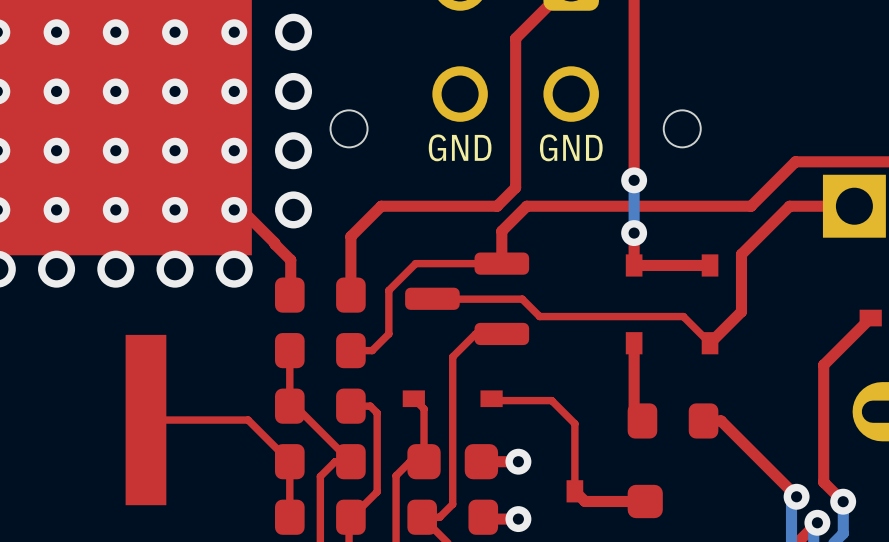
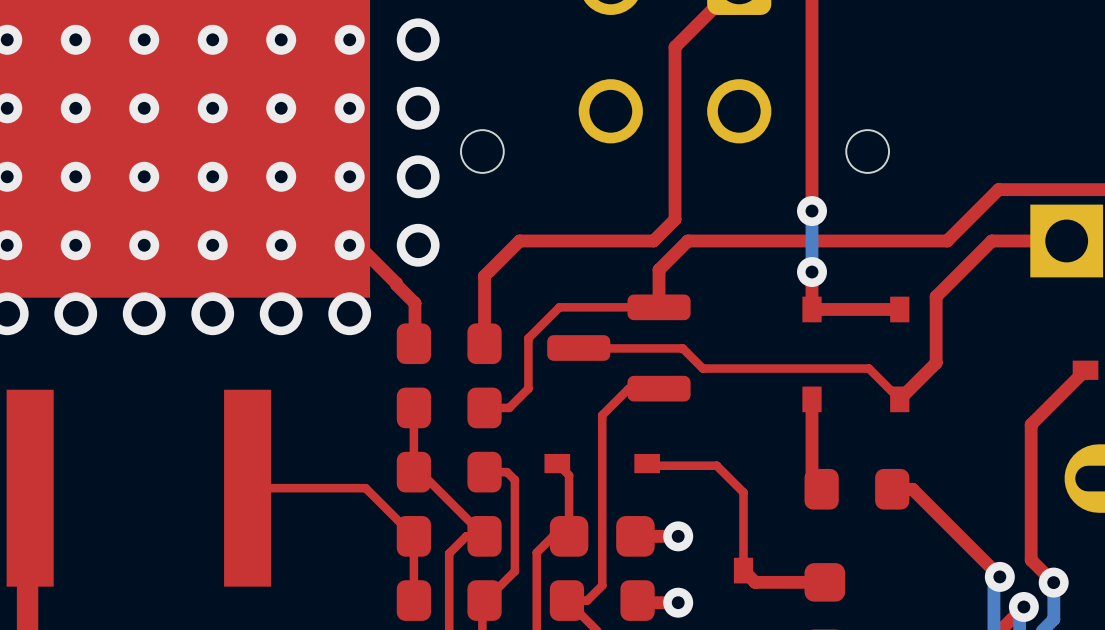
text: GND (460, 147) -> none
text: GND (571, 147) -> none

